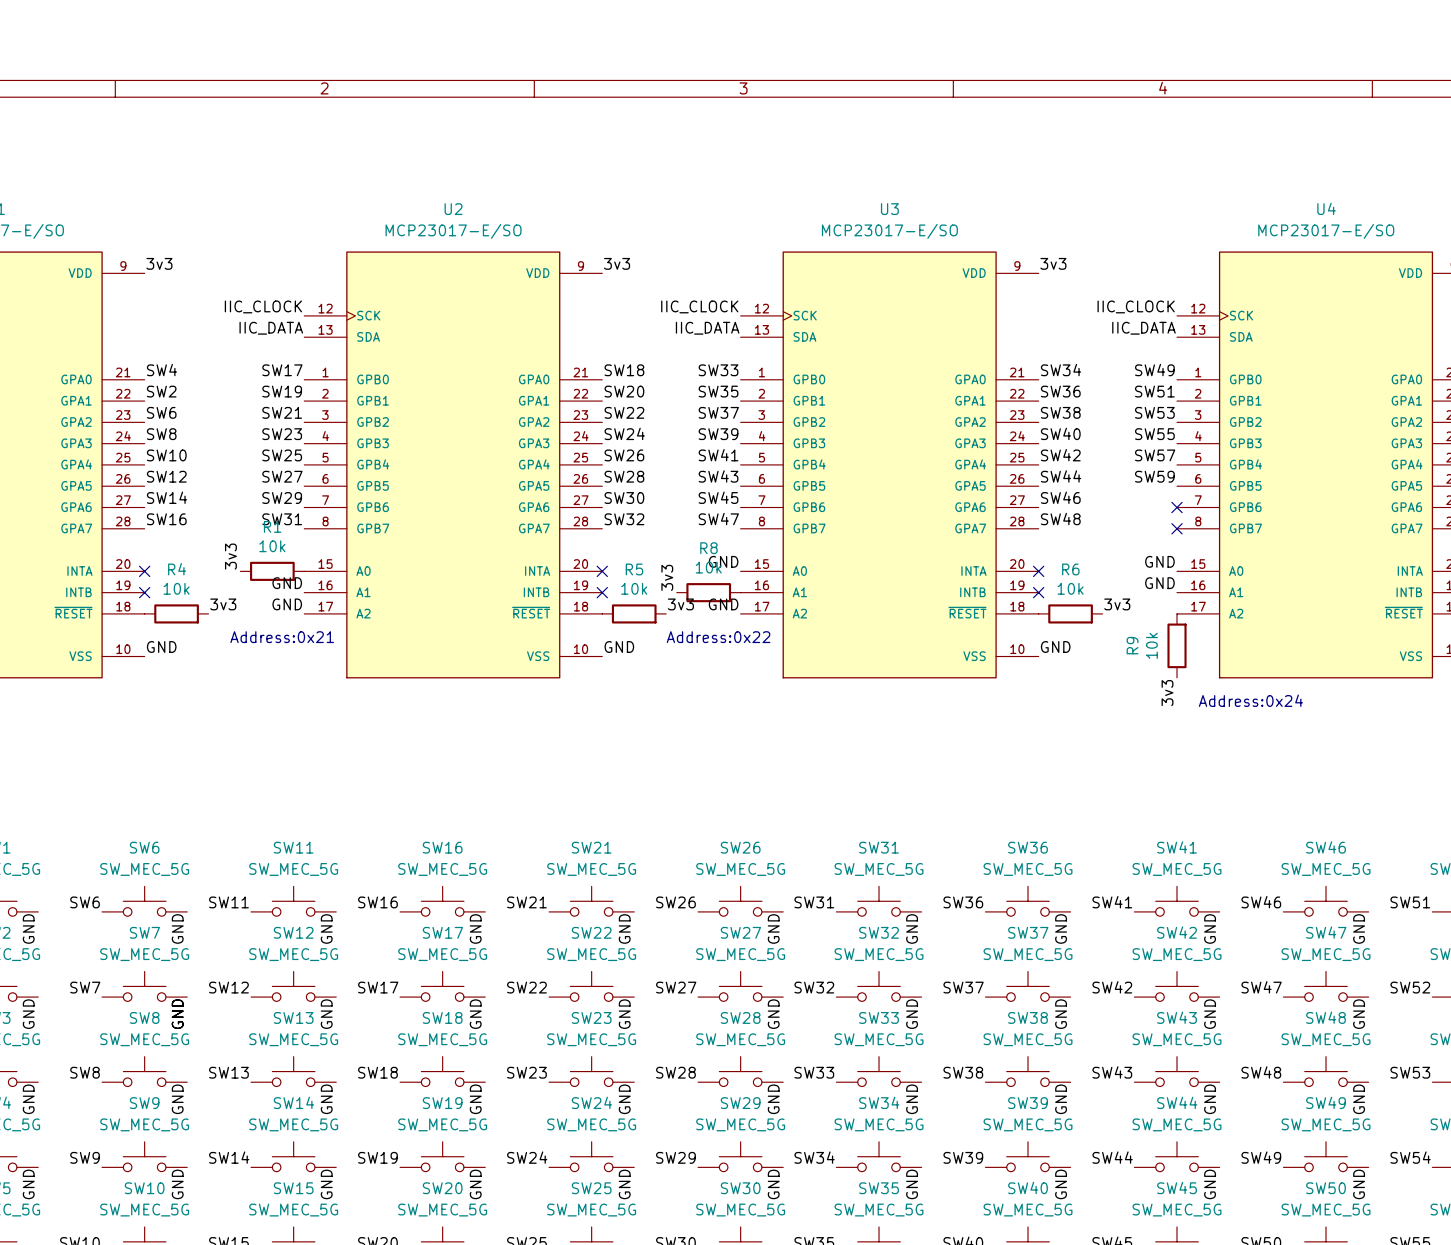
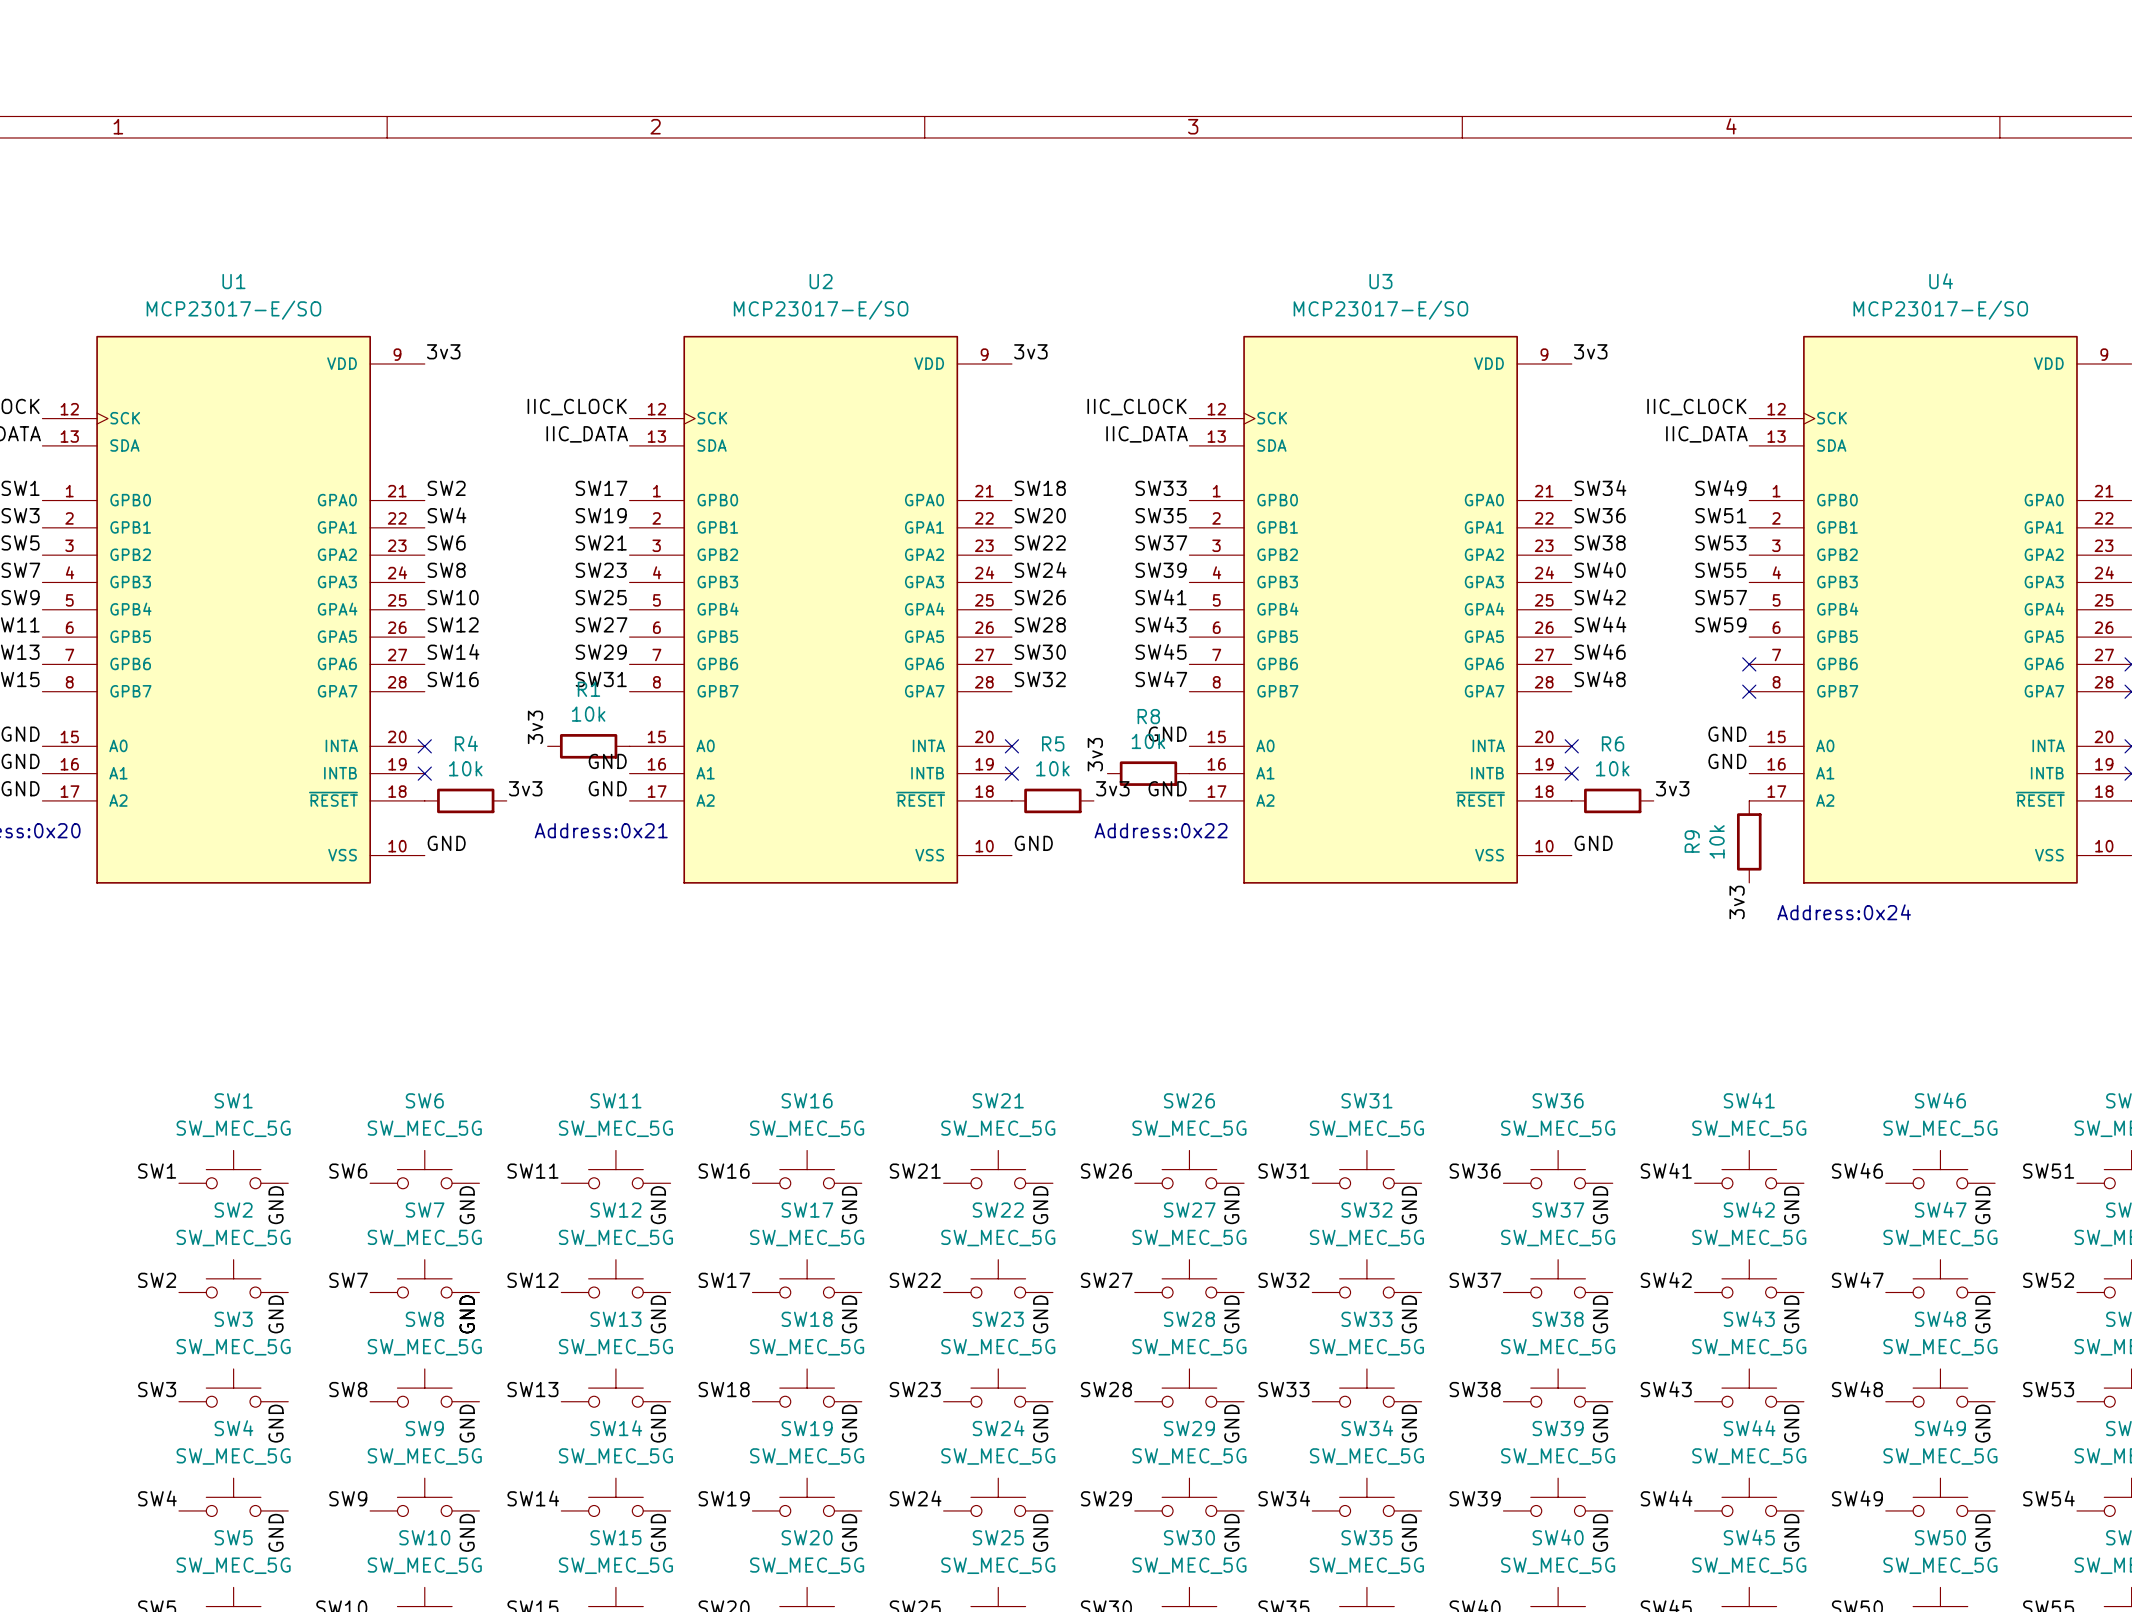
label: SW4 (161, 370) -> SW2 (446, 488)
label: SW2 (161, 391) -> SW4 (446, 515)

